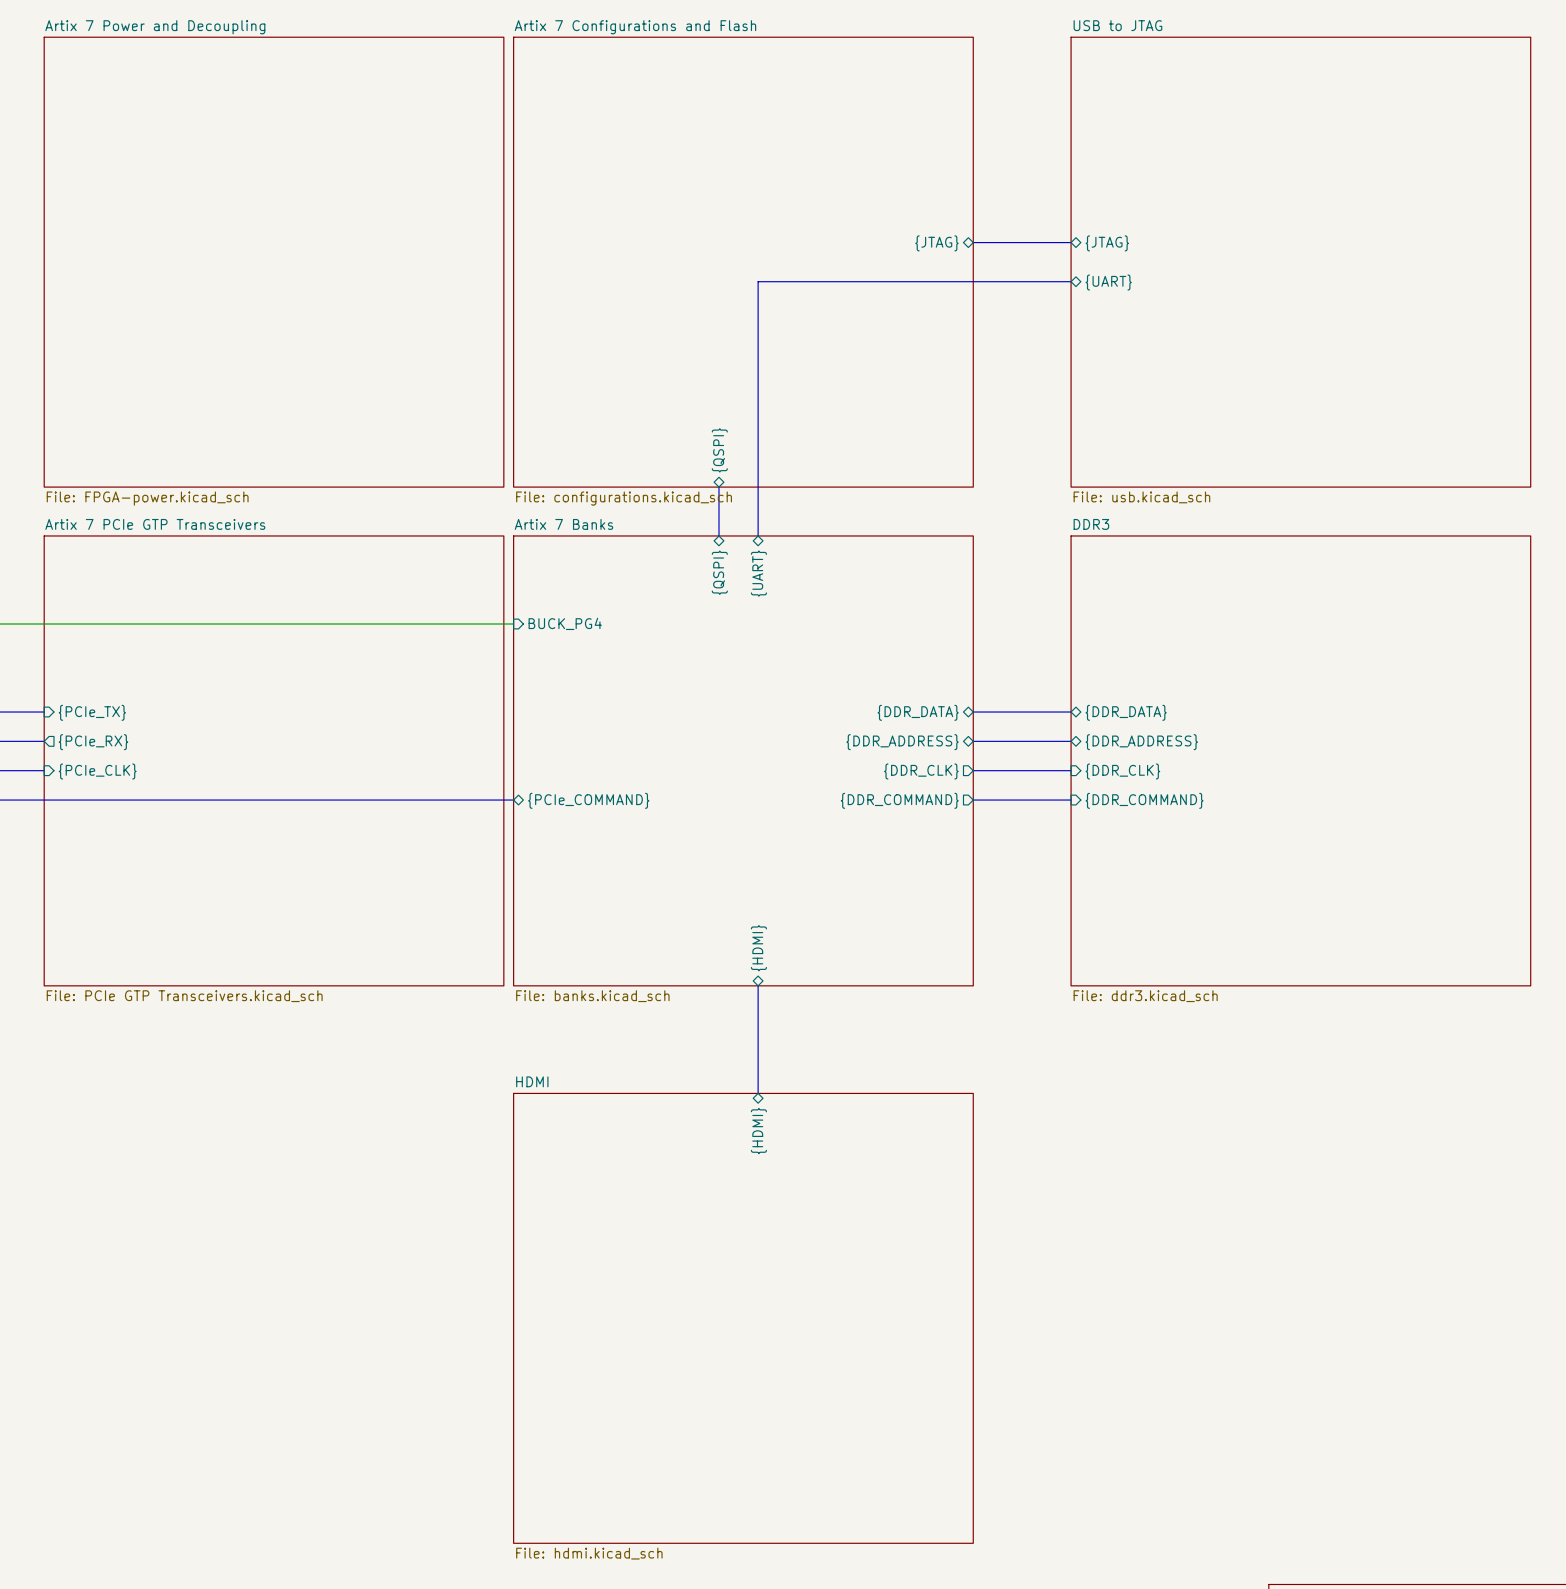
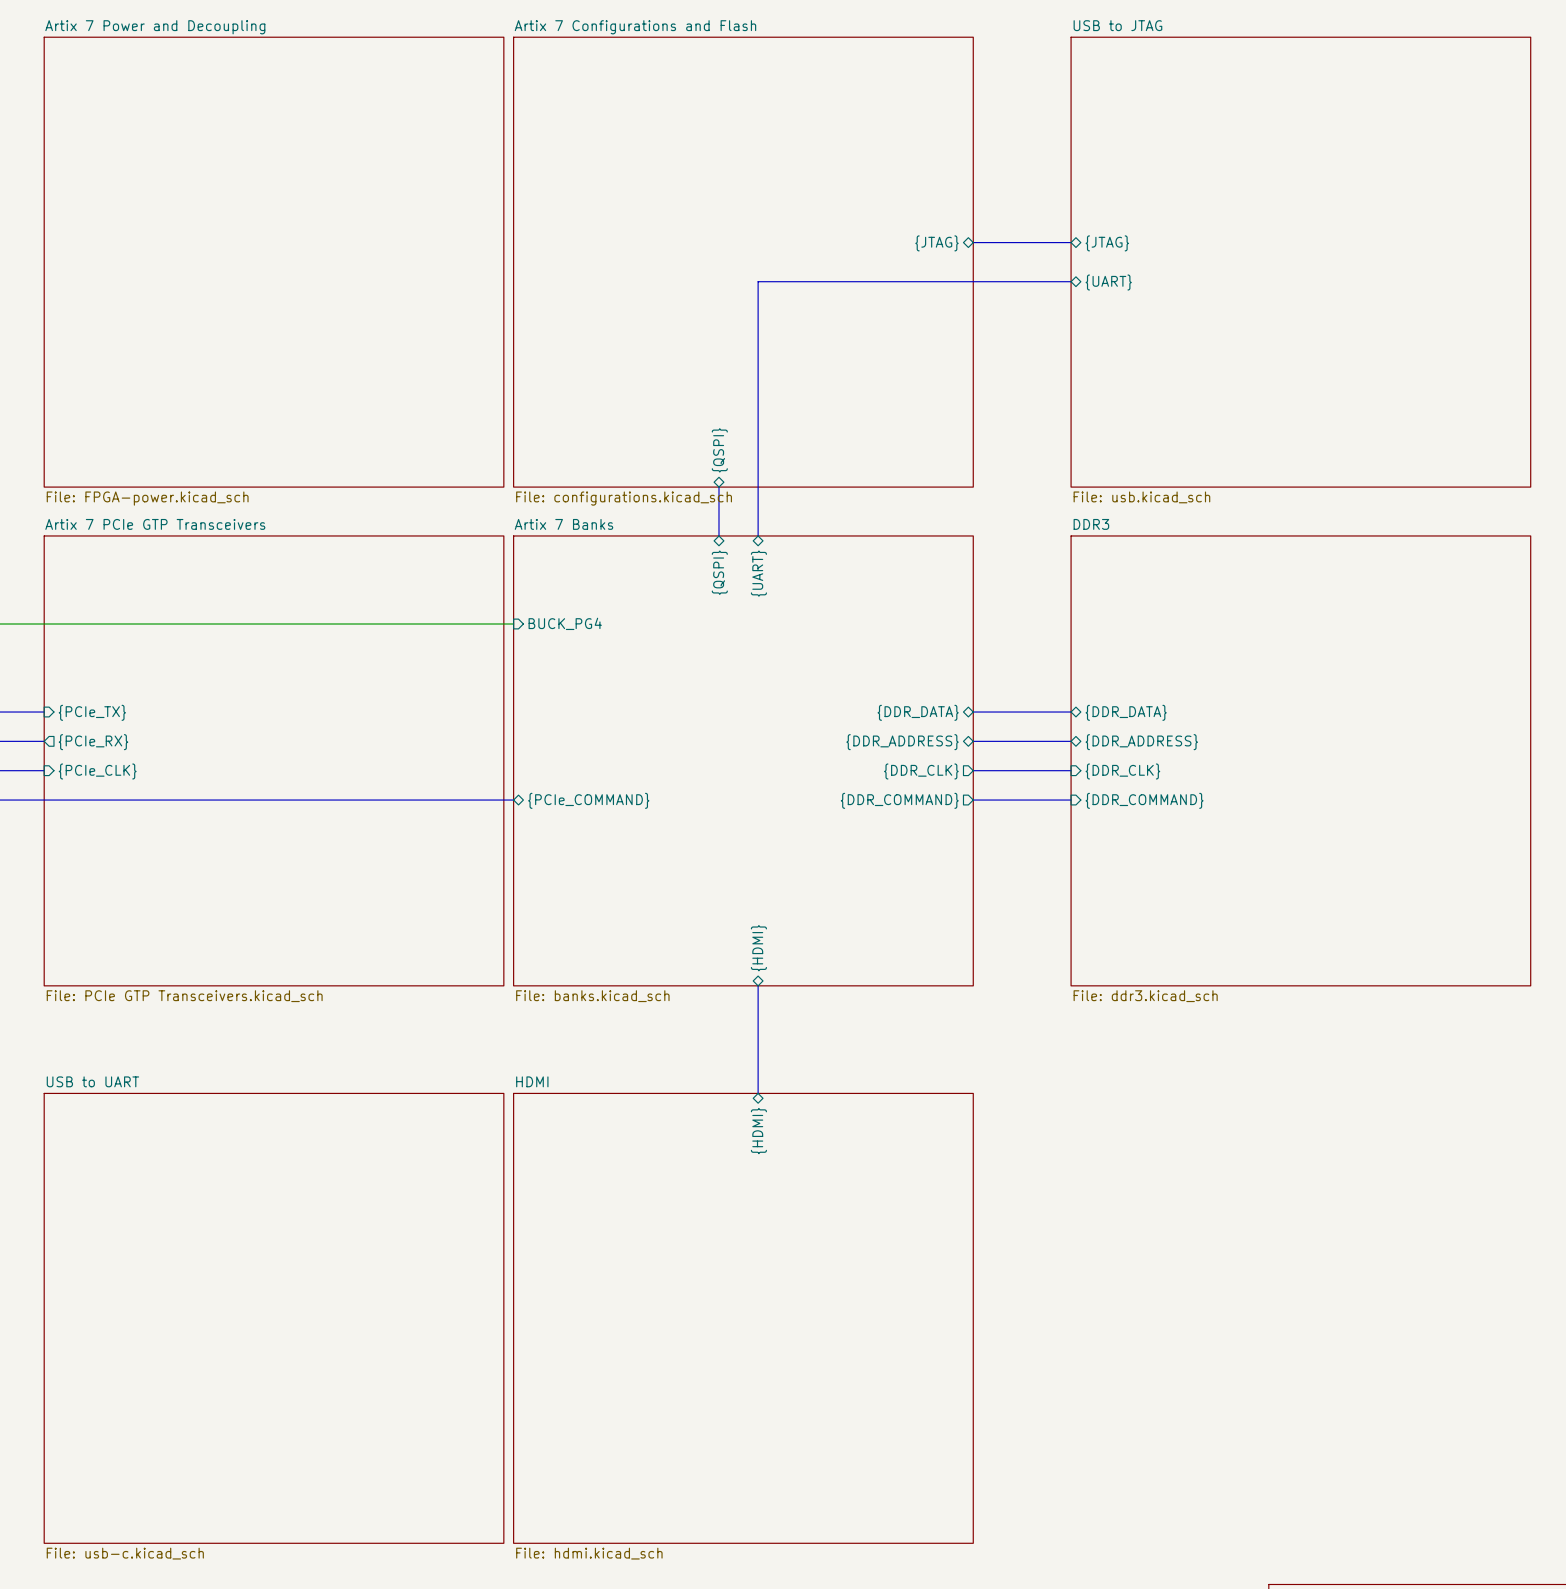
sheet USB to UART: none -> File: usb-c.kicad_sch (274, 1318)

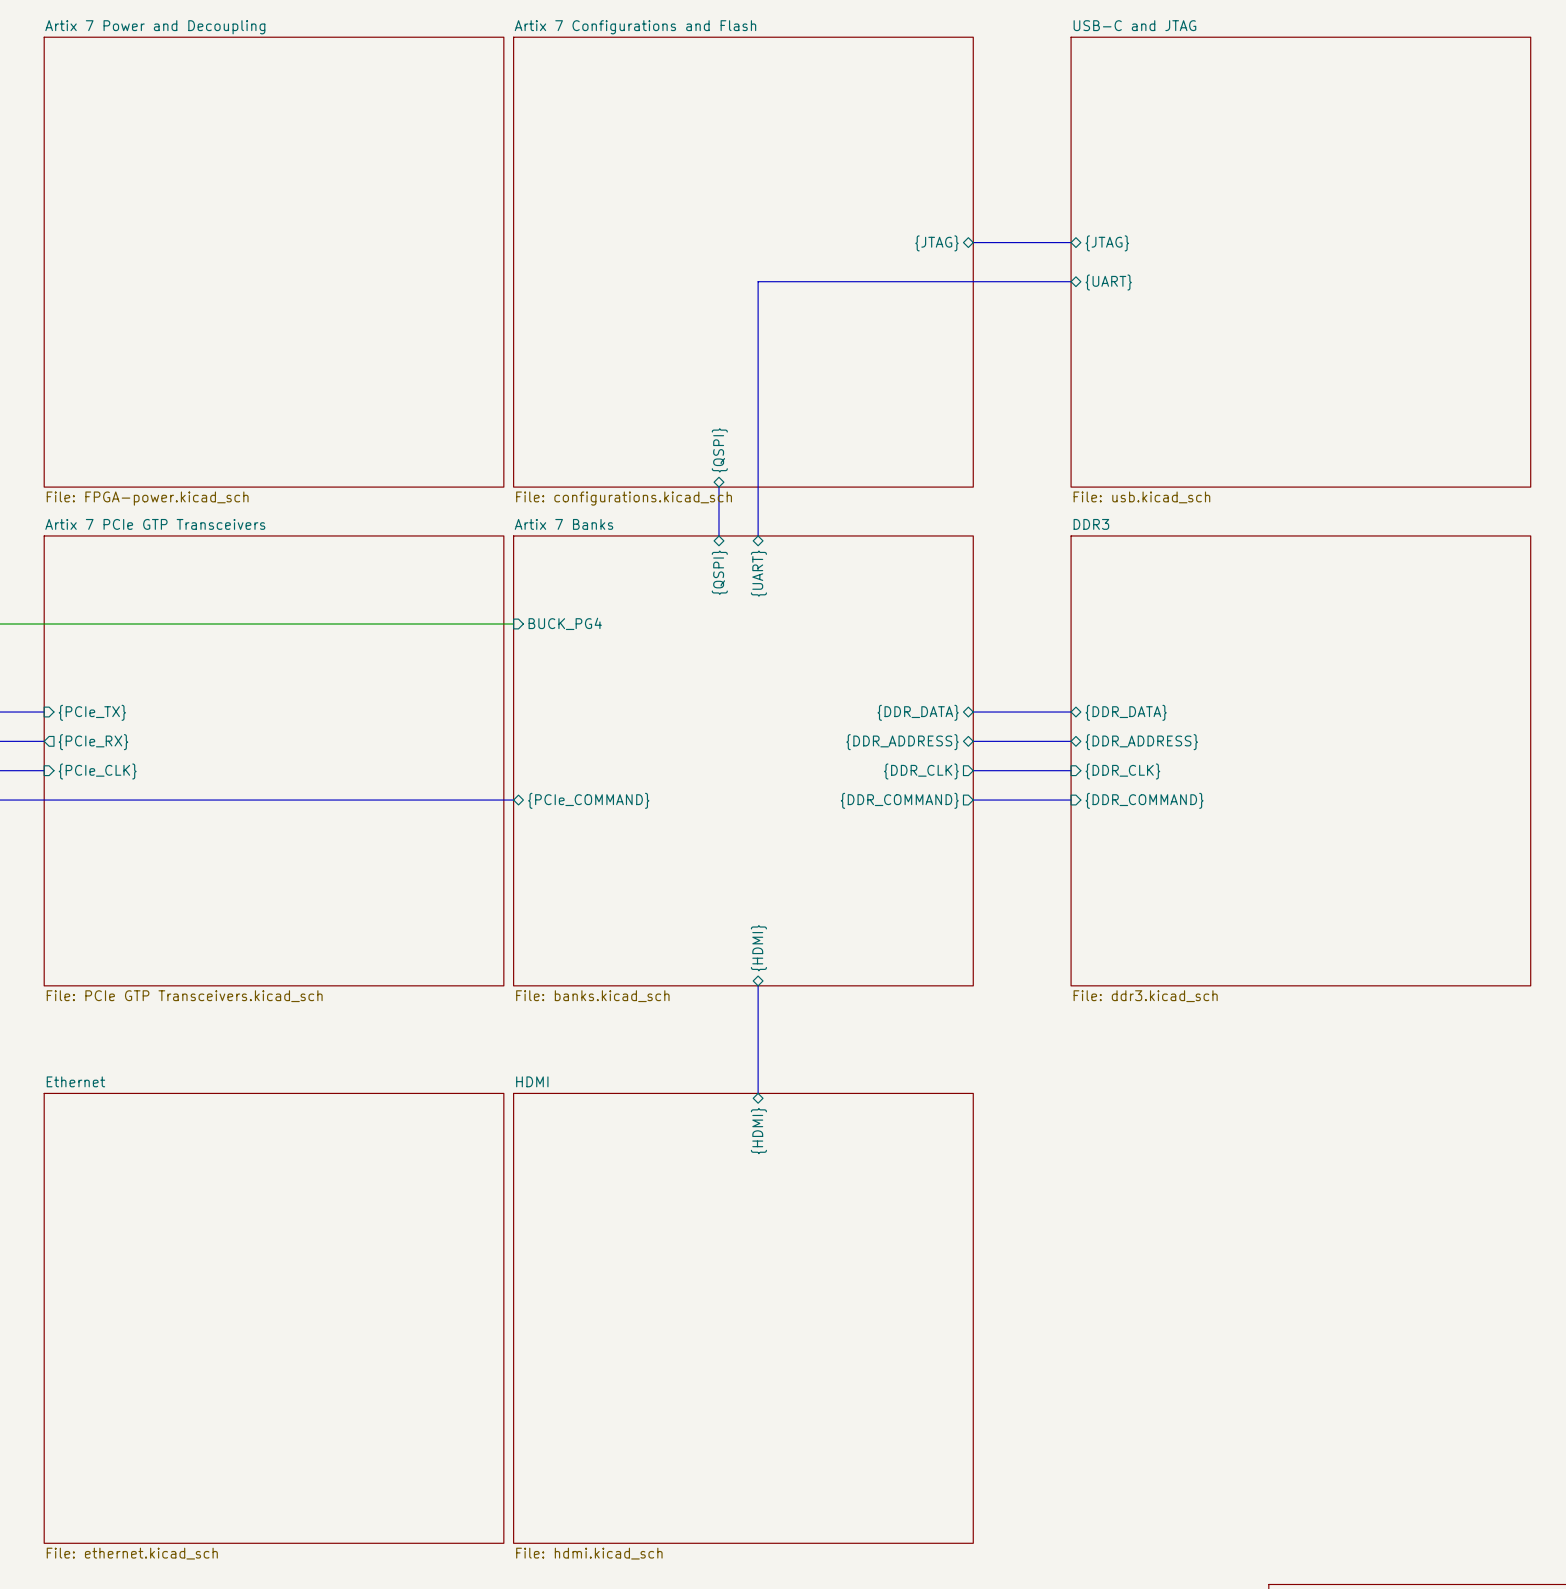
sheet USB to JTAG name: USB to JTAG (1117, 25) -> USB-C and JTAG (1134, 25)
sheet USB to UART name: USB to UART (92, 1081) -> Ethernet (75, 1081)
sheet USB to UART value: File: usb-c.kicad_sch (125, 1553) -> File: ethernet.kicad_sch (132, 1553)

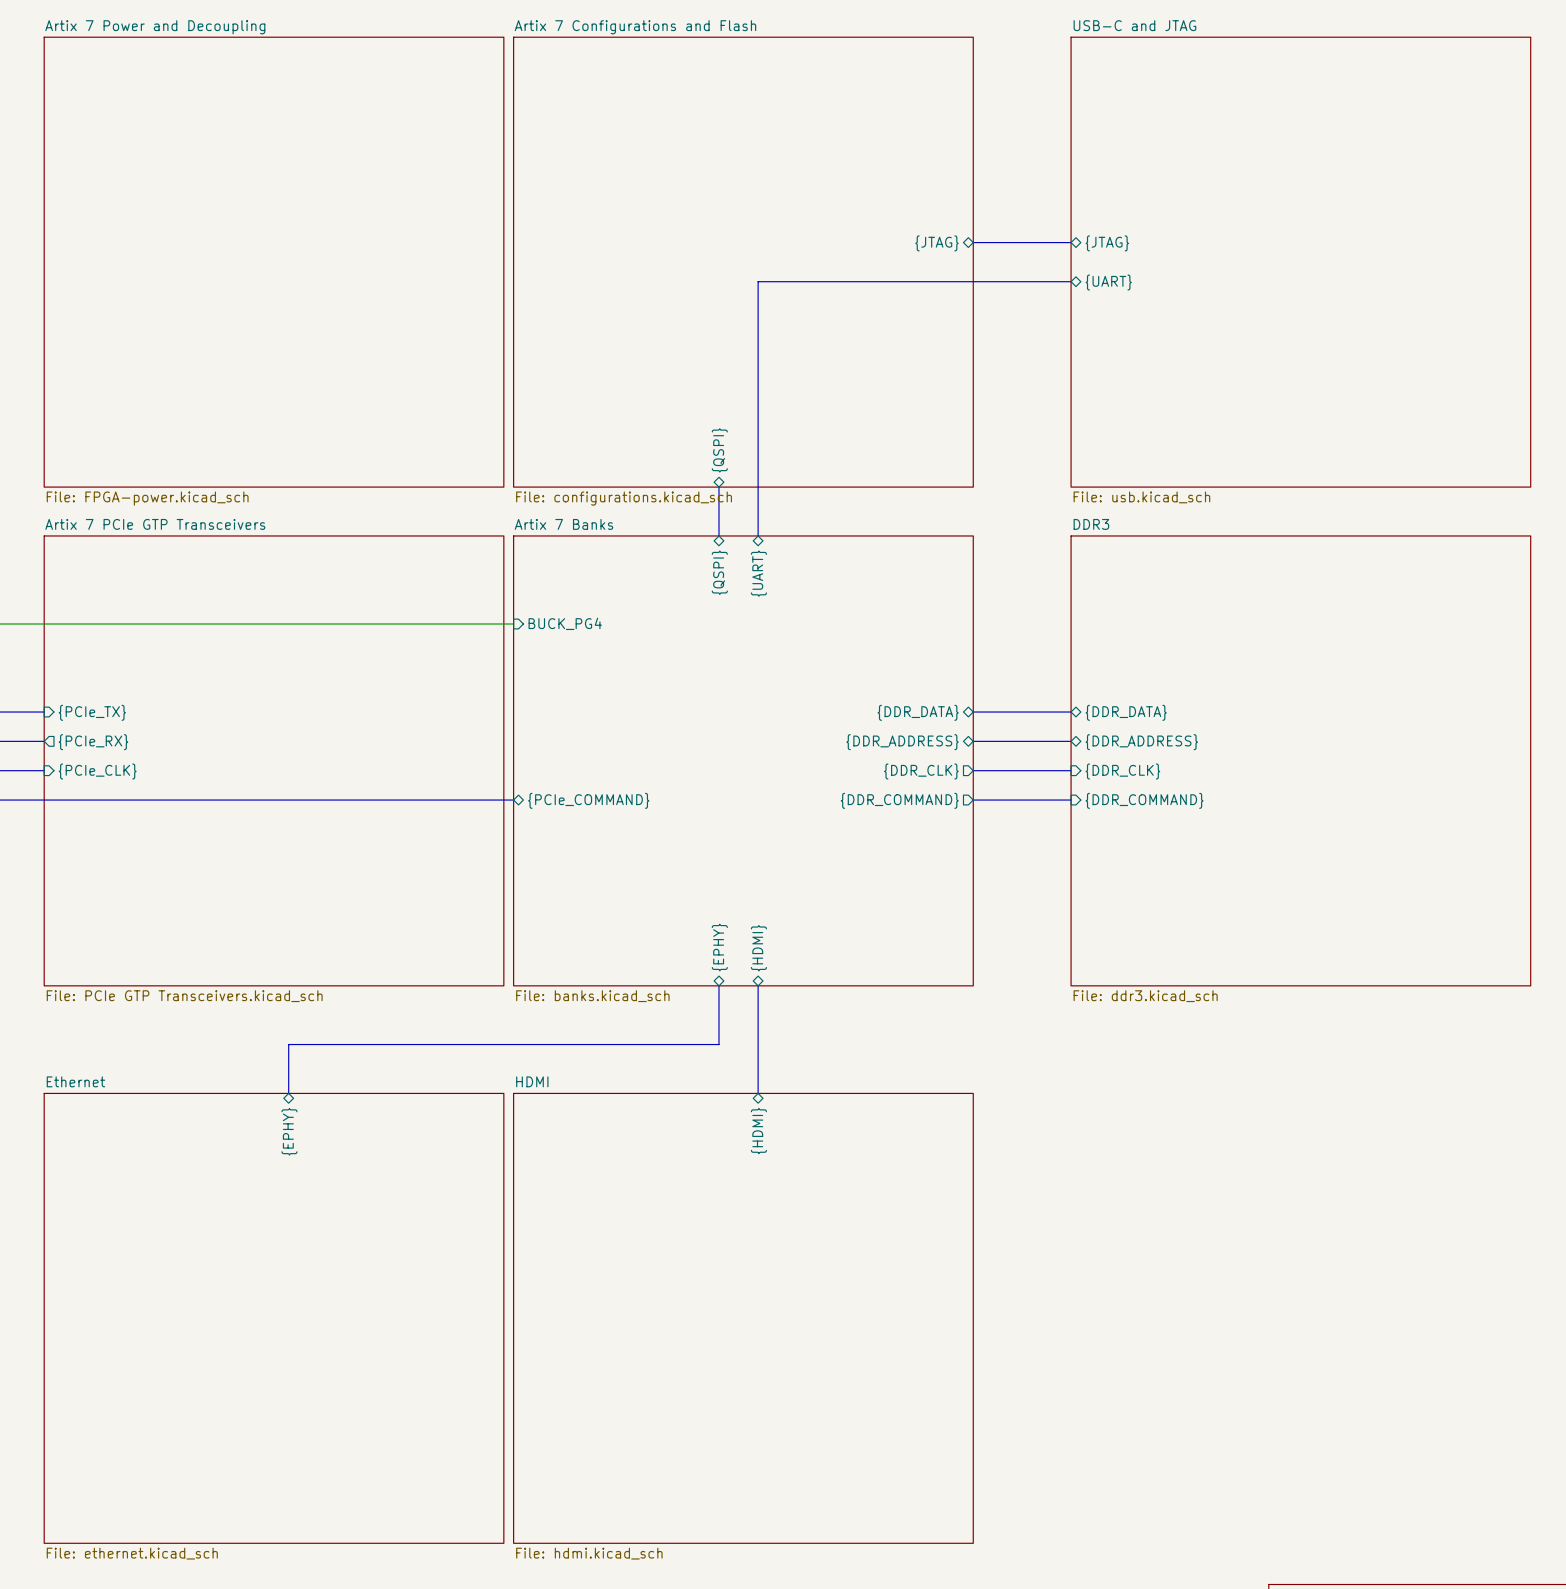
sheet pin: none -> {EPHY} (719, 947)
bus: none -> (718, 985) (718, 1044) (288, 1044) (288, 1093)
sheet pin: none -> {EPHY} (289, 1131)

